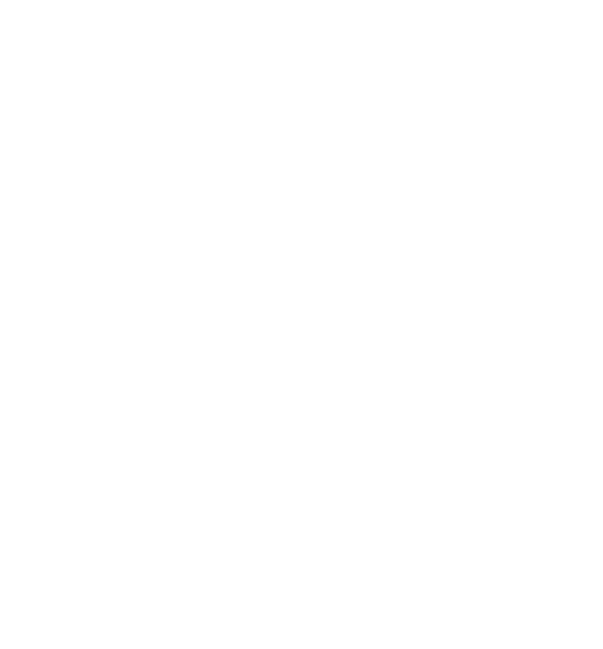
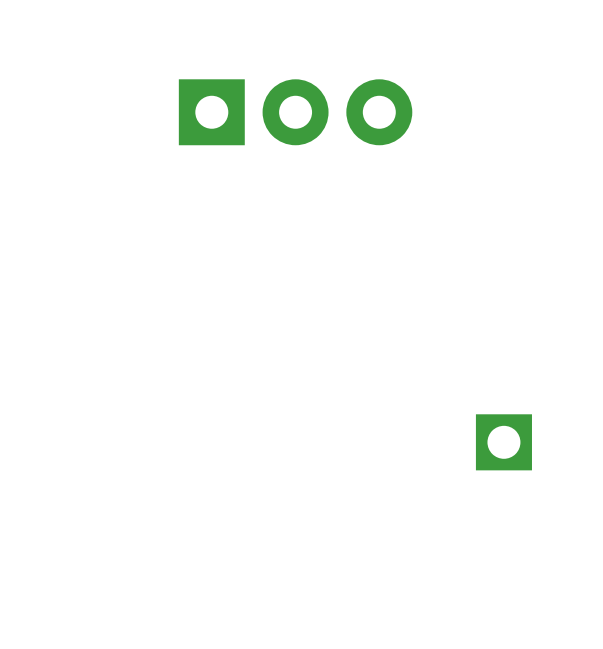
part: none -> (295, 112)
part: none -> (503, 442)

